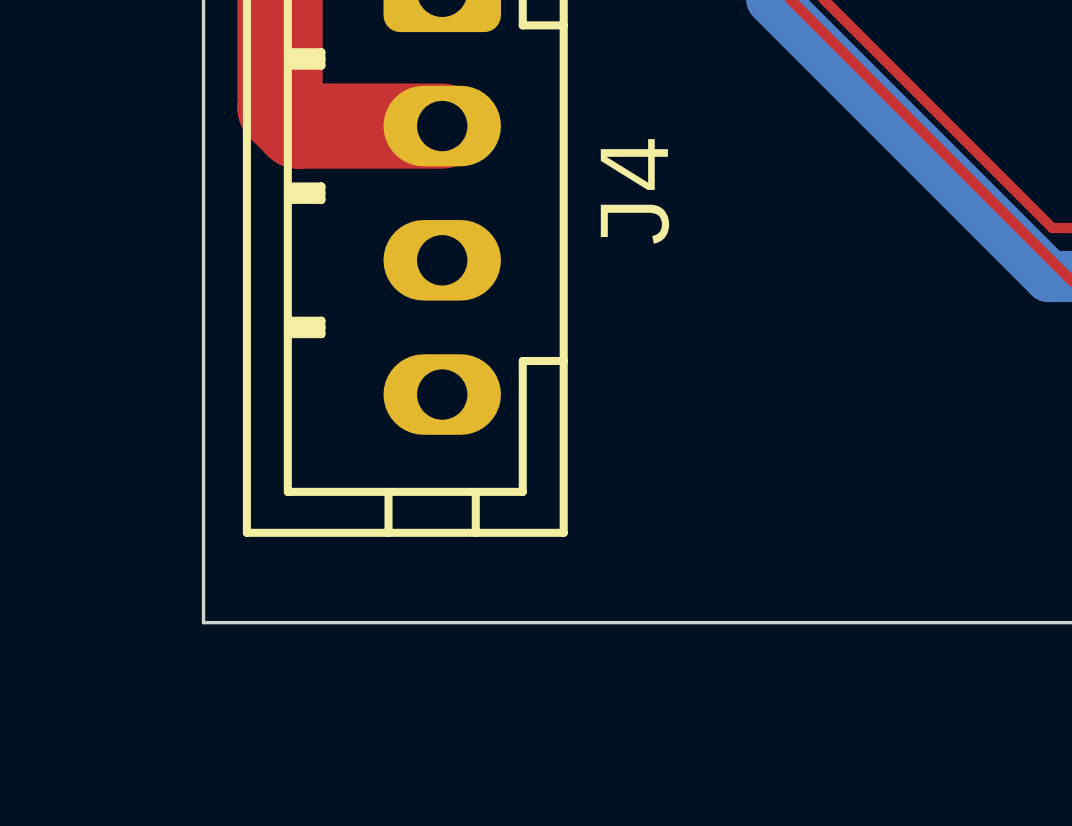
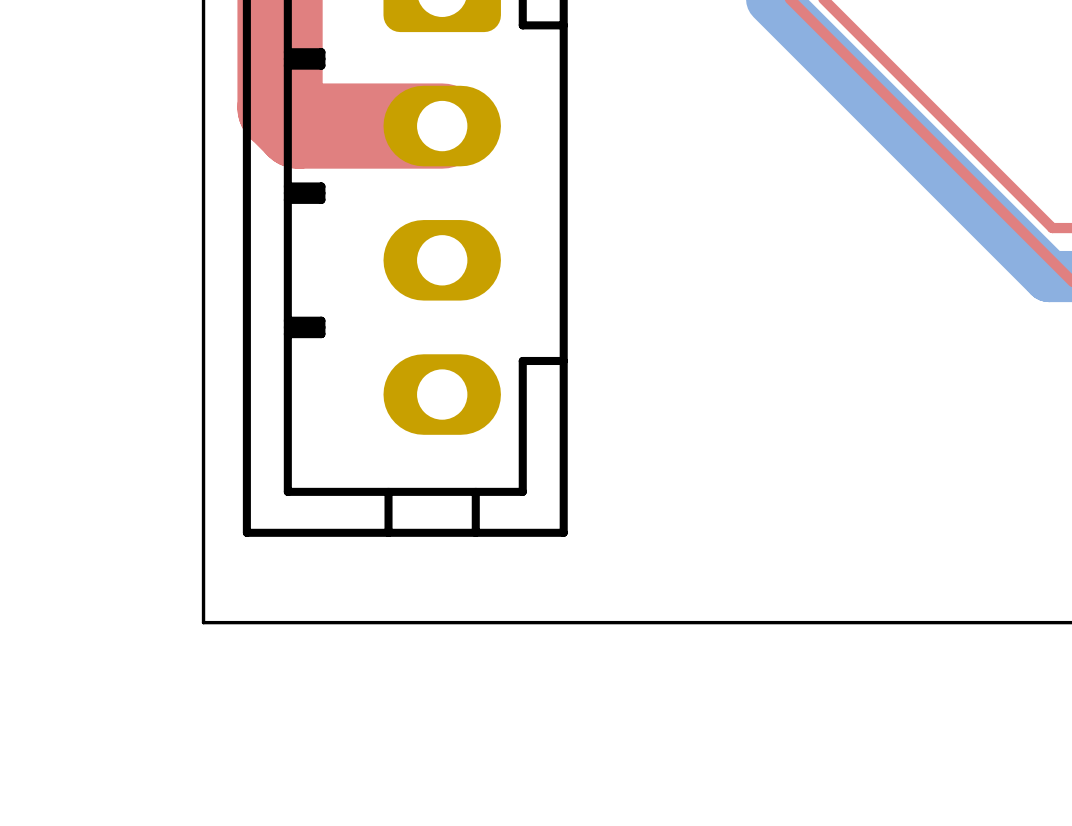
J4 name: J4 (634, 191) -> none

